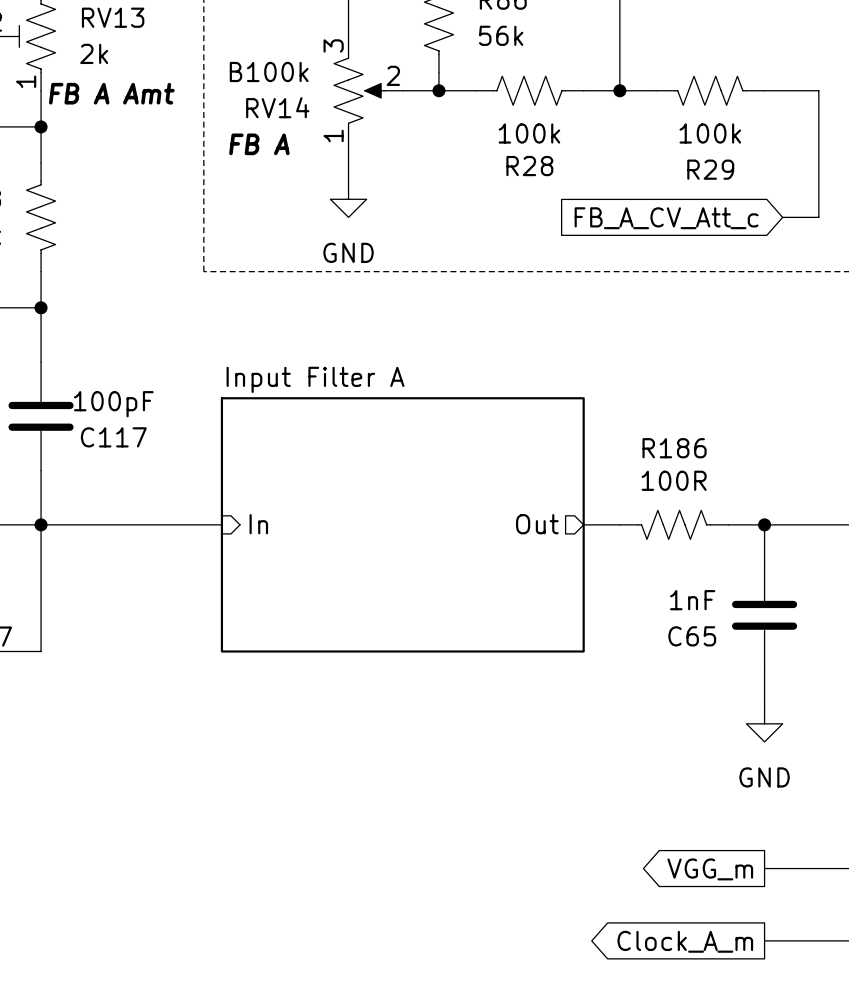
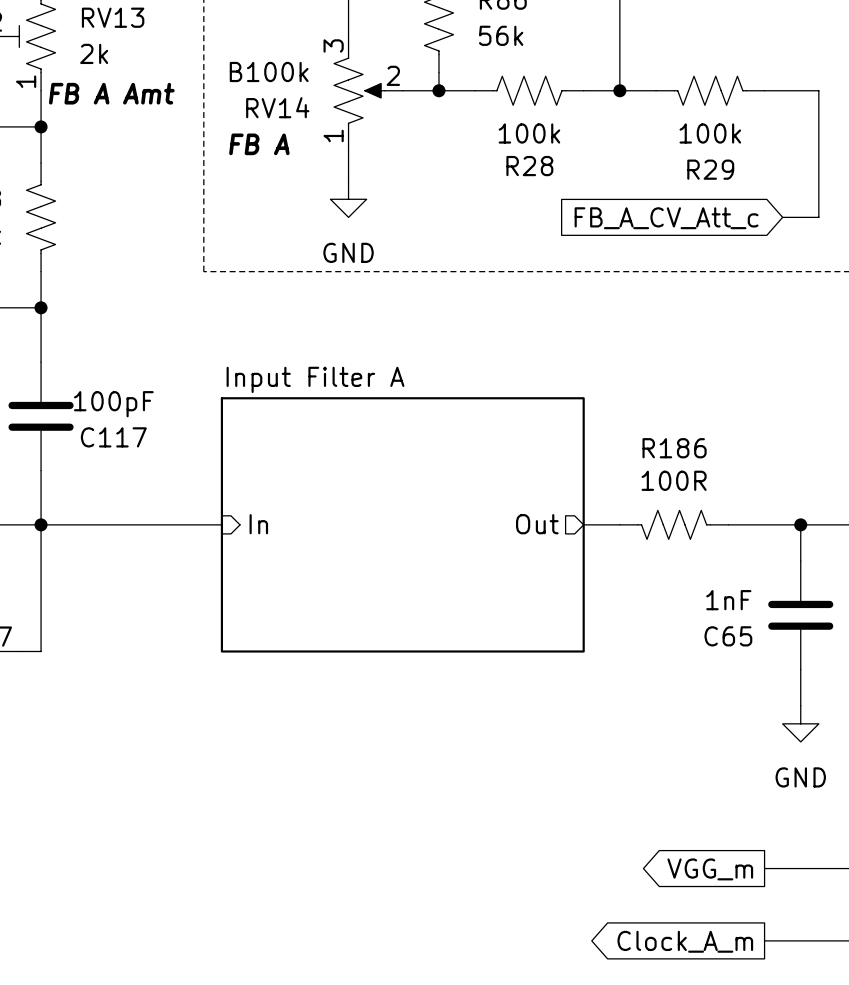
wire: (764, 524) (764, 561) -> (800, 524) (800, 561)
junction position: (764, 524) -> (800, 524)
C65 position: (764, 615) -> (800, 615)
wire: (764, 669) (764, 705) -> (800, 669) (800, 705)
power symbol position: GND (764, 723) -> GND (800, 723)

